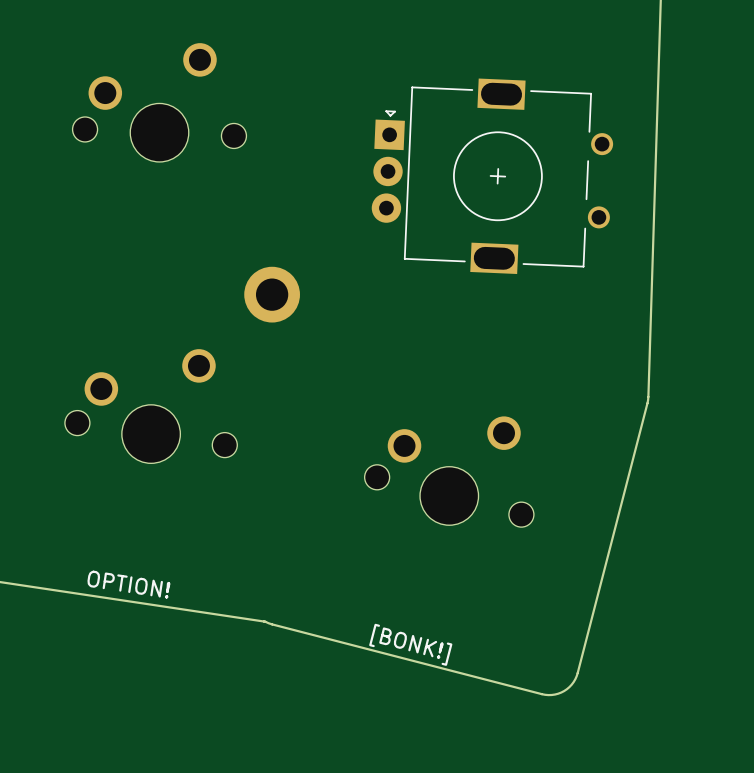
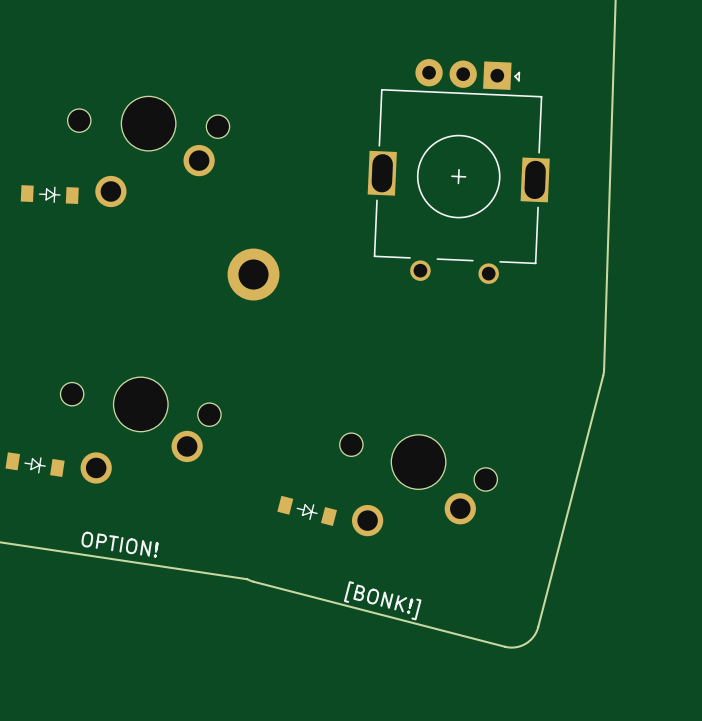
part rotation: 0° (159, 102) -> 180° (148, 151)
part rotation: 0° (492, 176) -> 90° clockwise (458, 171)
part: none -> (49, 194)
part rotation: 0° (151, 406) -> 180° (140, 430)
part rotation: 0° (449, 471) -> 180° (418, 484)
part: none -> (35, 464)
part: none -> (307, 510)

